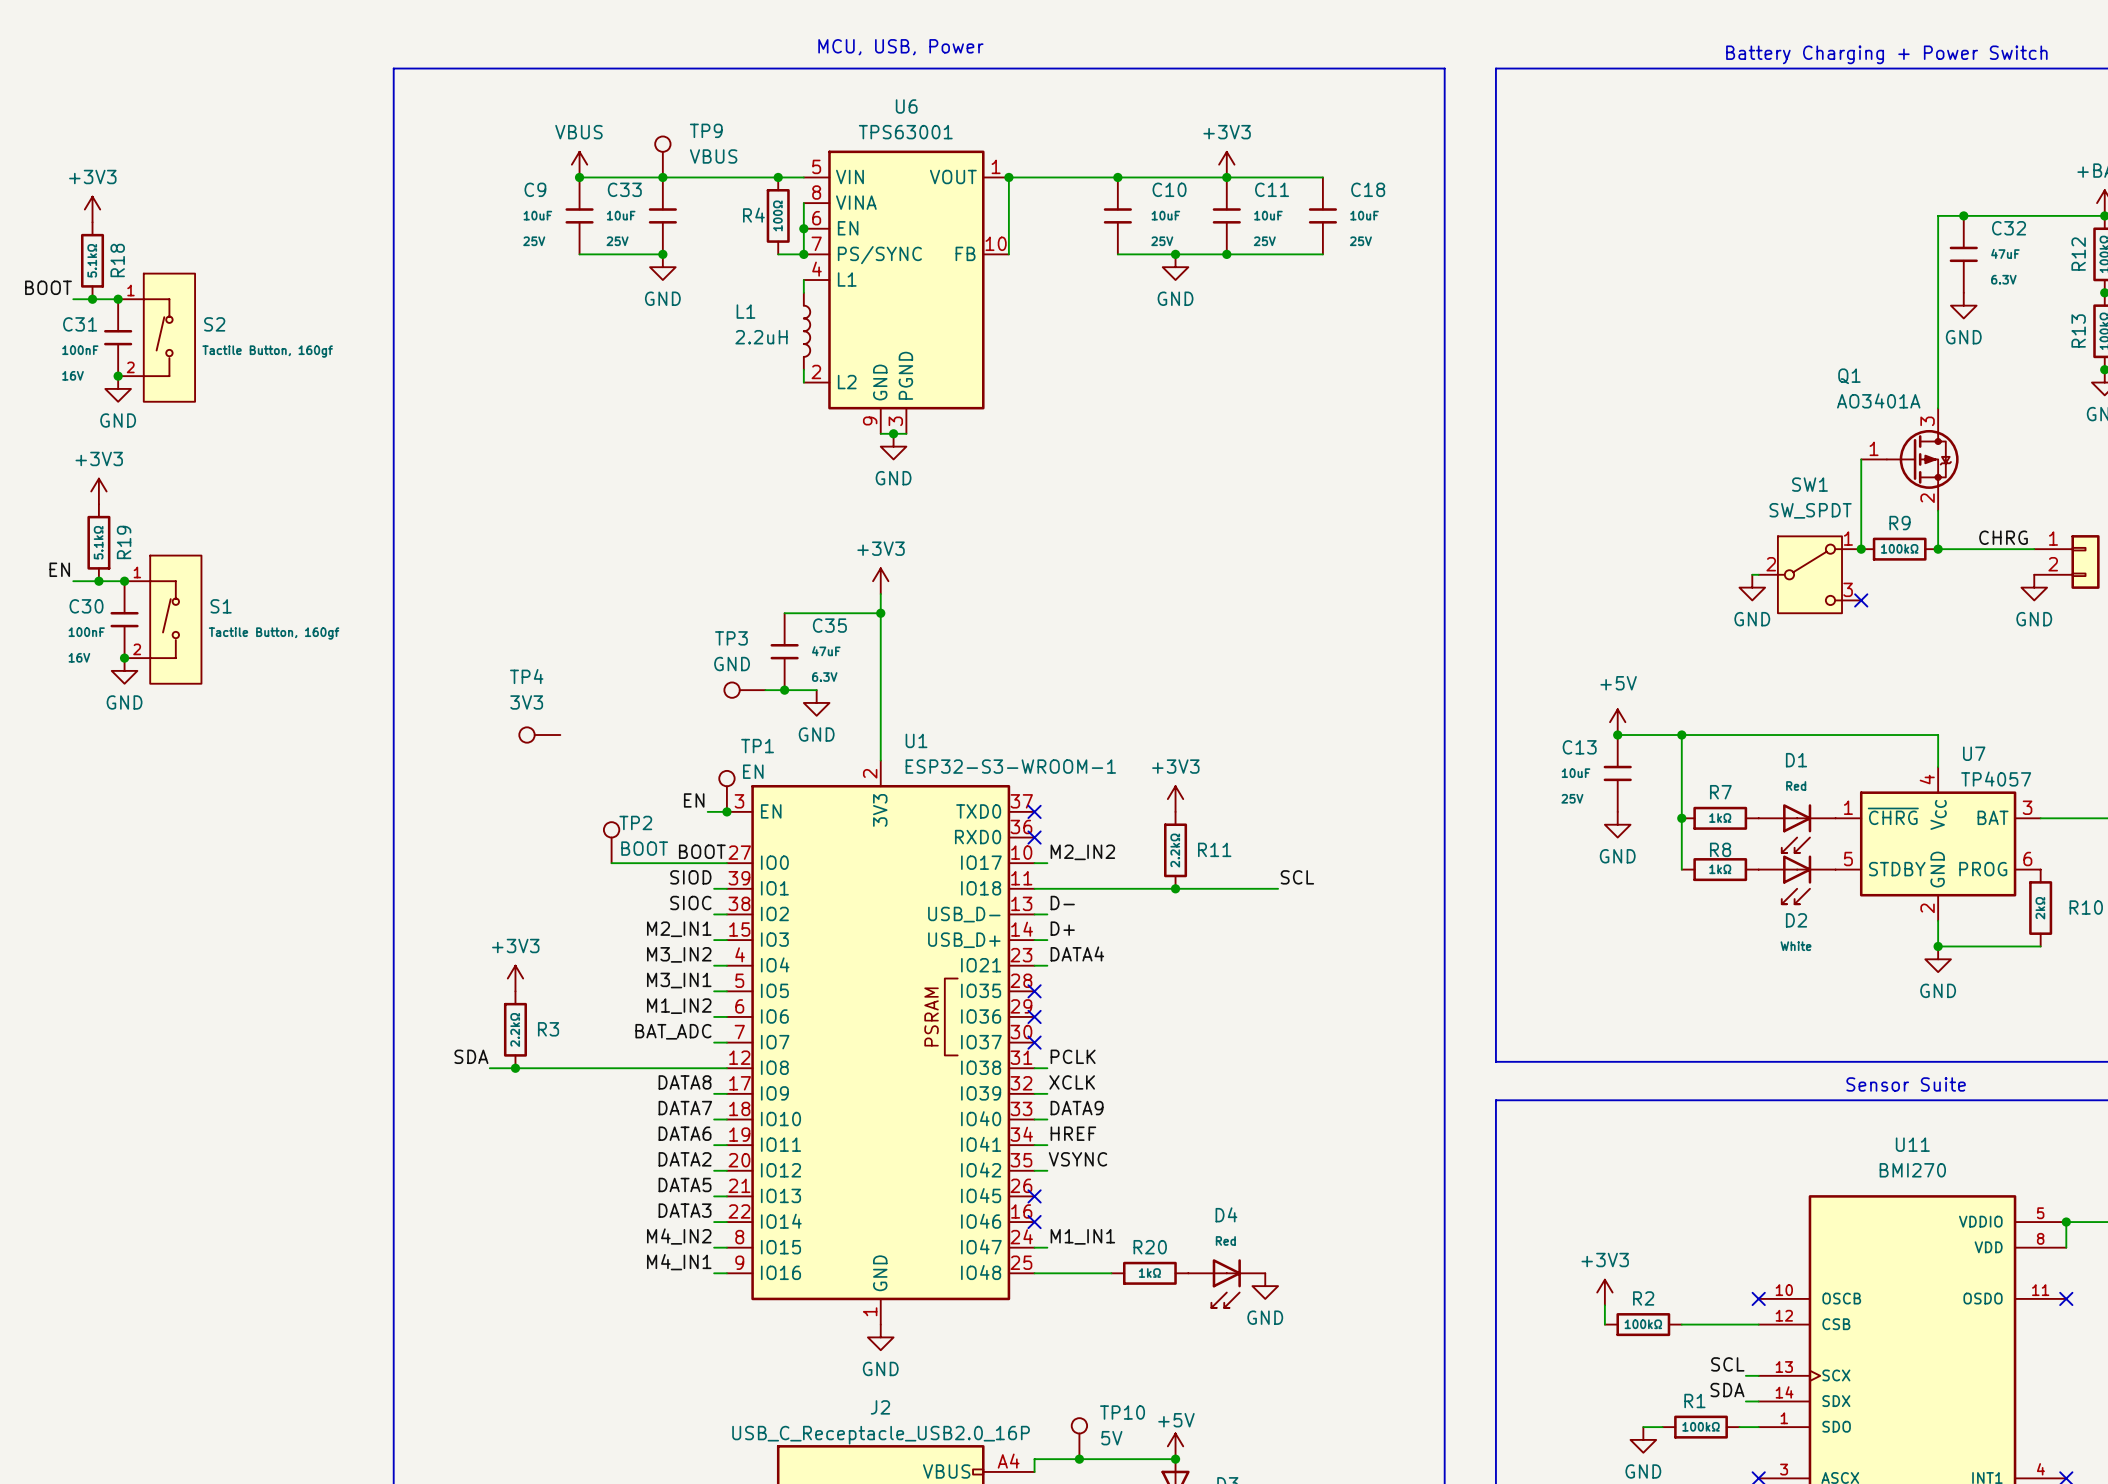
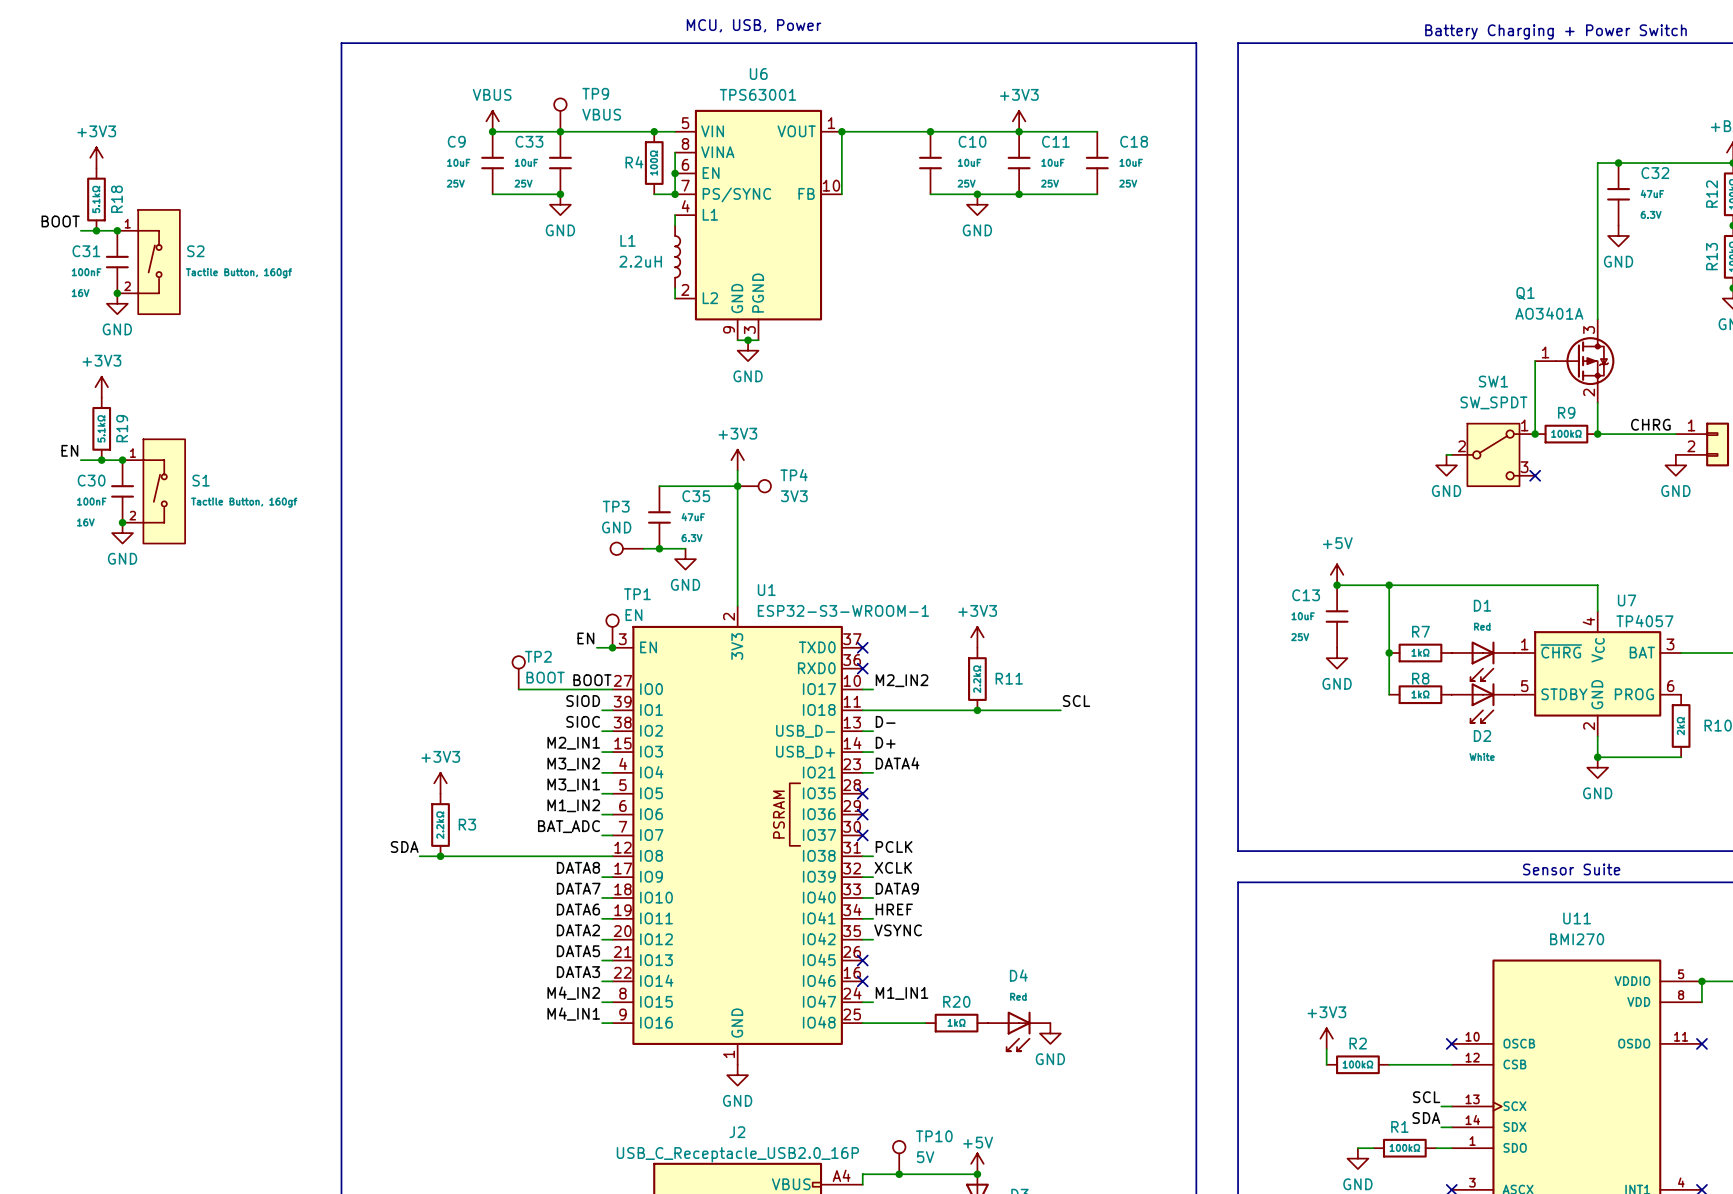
TP4 name position: TP4 (526, 676) -> TP4 (794, 475)
TP4 value position: 3V3 (526, 702) -> 3V3 (794, 496)
TP4 rotation: 0° (527, 735) -> 180° (764, 486)
TP4 position: (539, 735) -> (754, 486)

